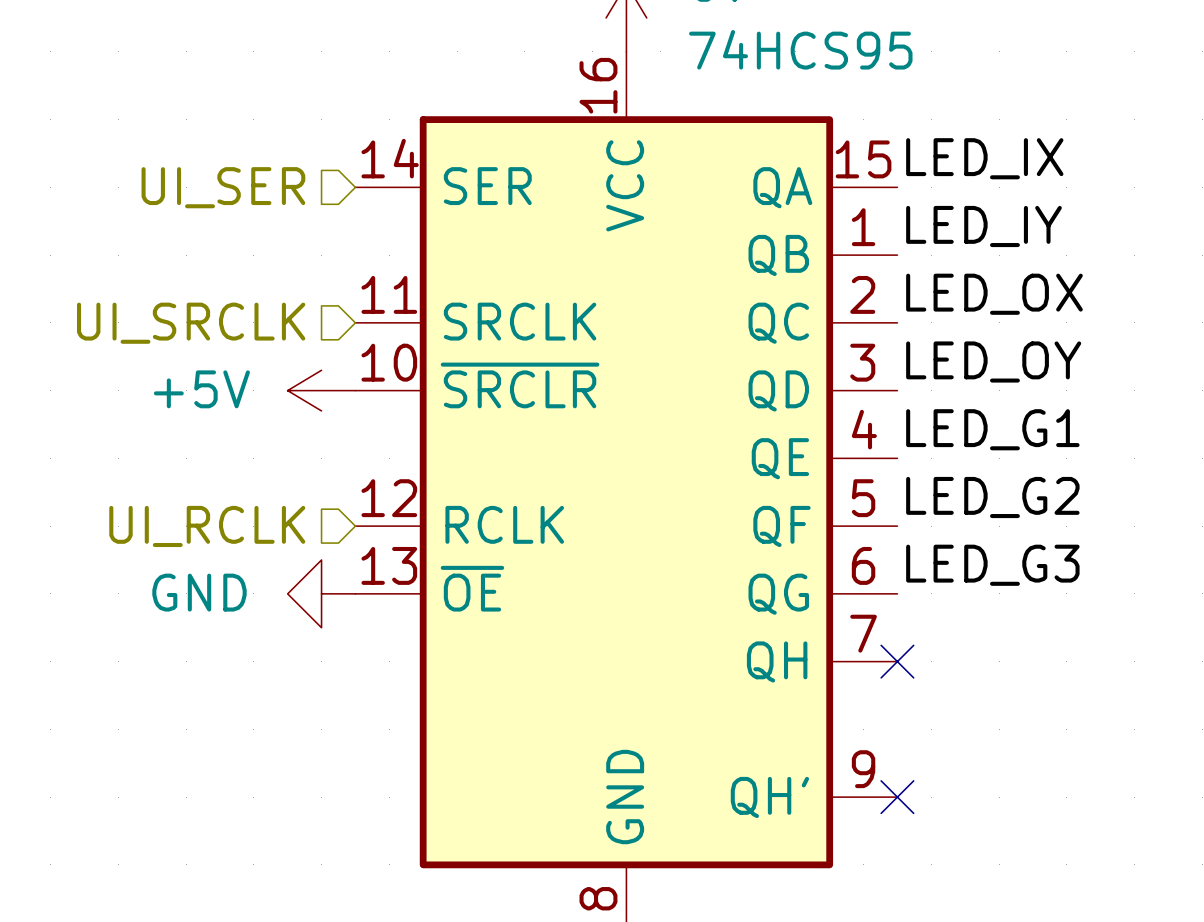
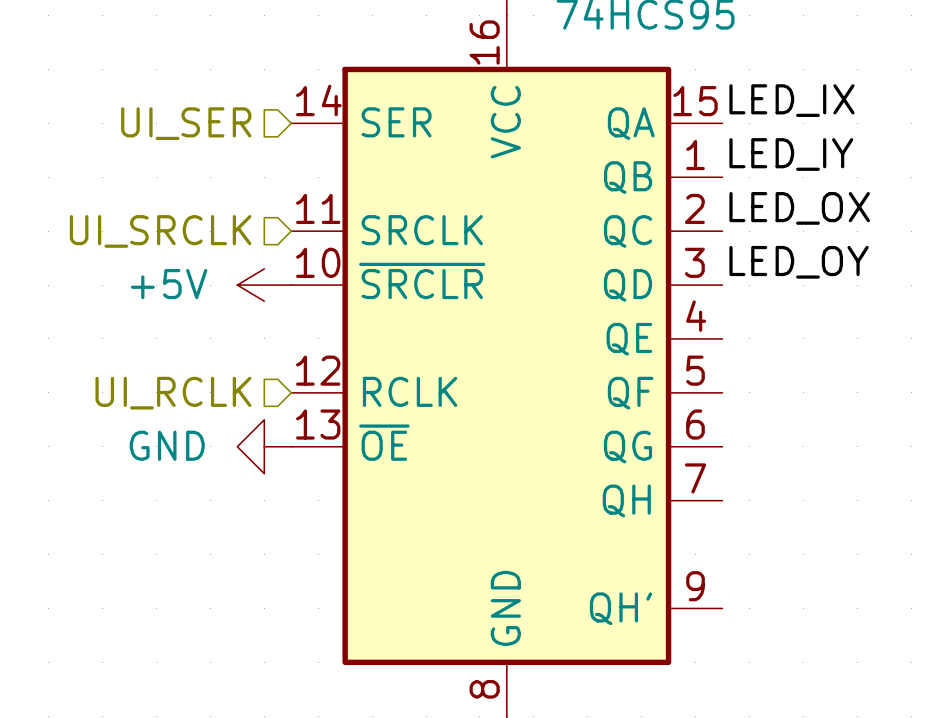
label: LED_G1 (992, 429) -> none
label: LED_G2 (992, 497) -> none
label: LED_G3 (992, 565) -> none
no-connect mark: (897, 661) -> none
no-connect mark: (897, 797) -> none

